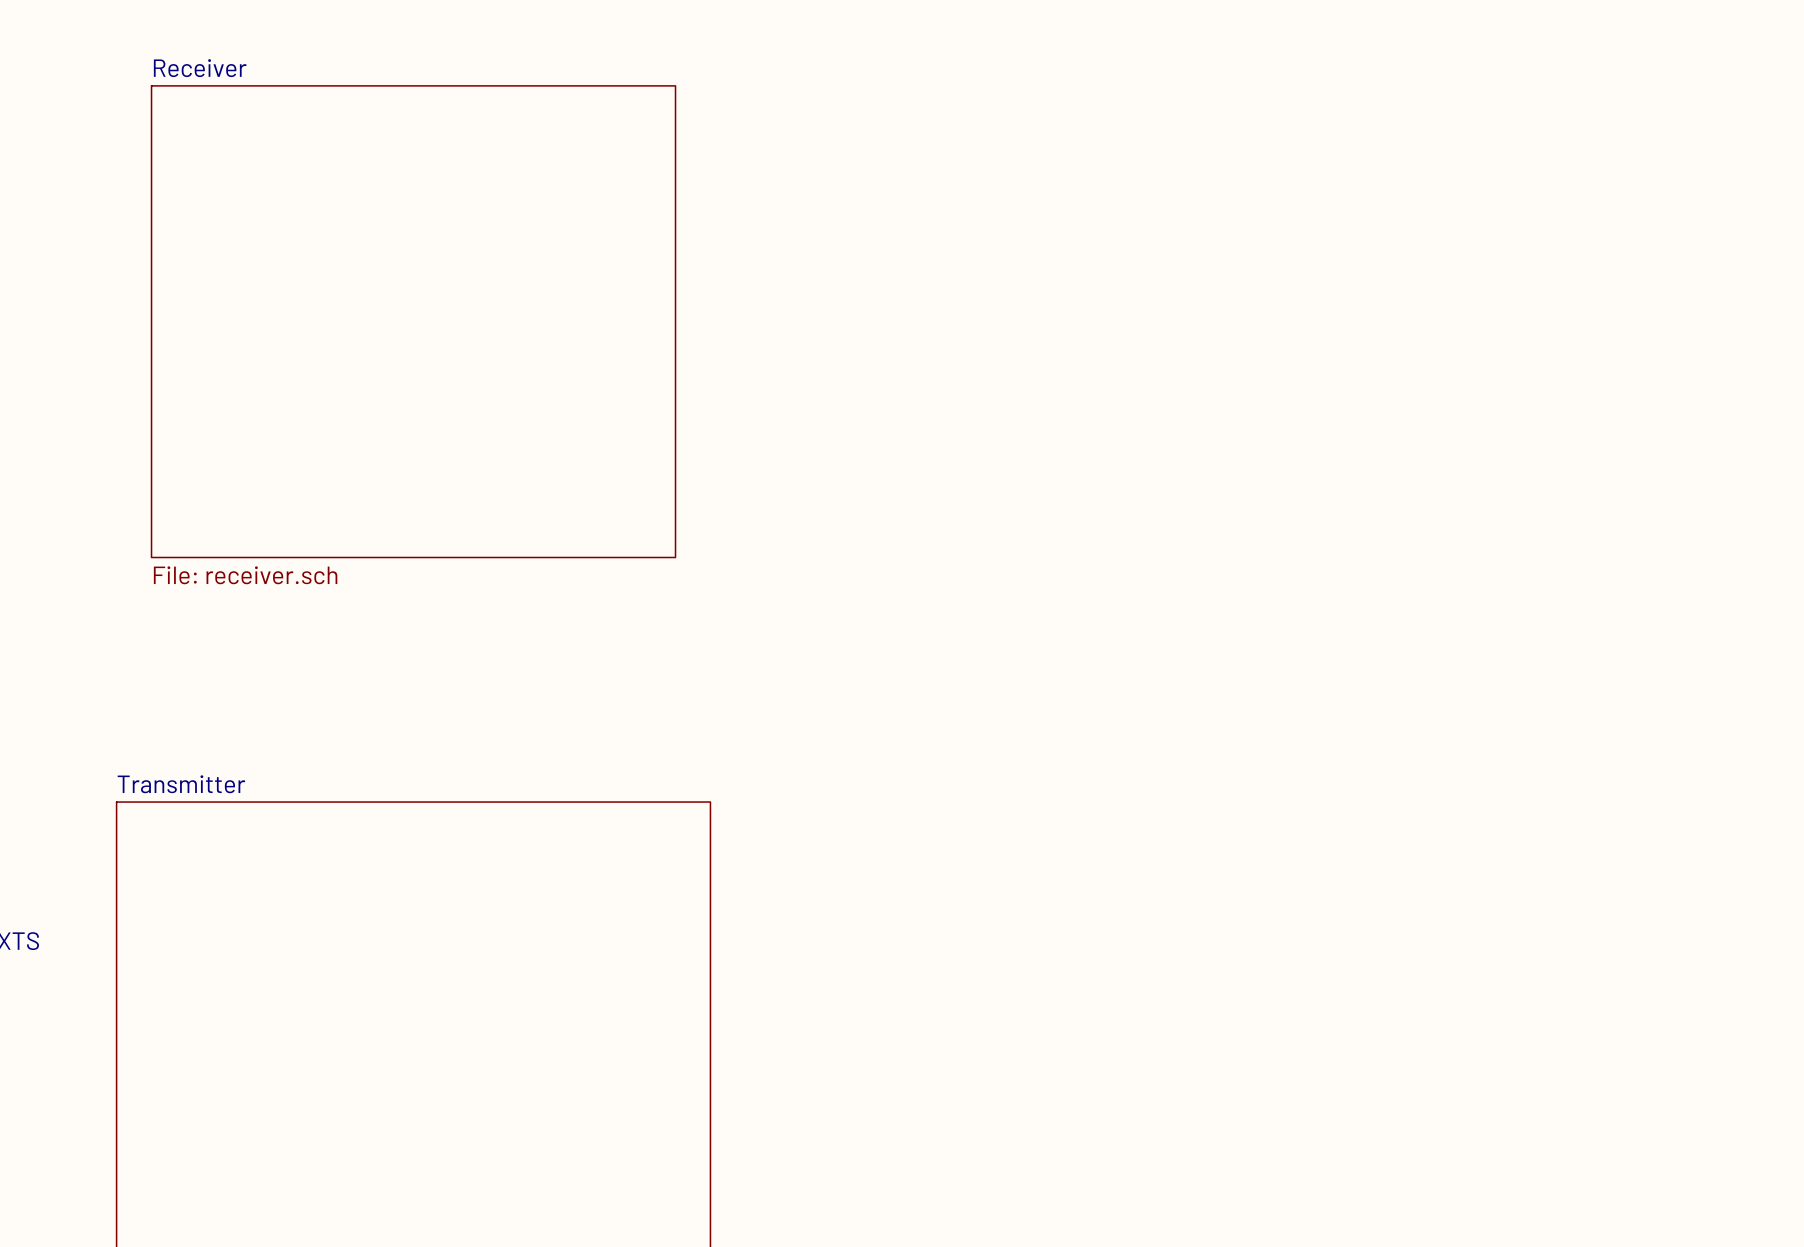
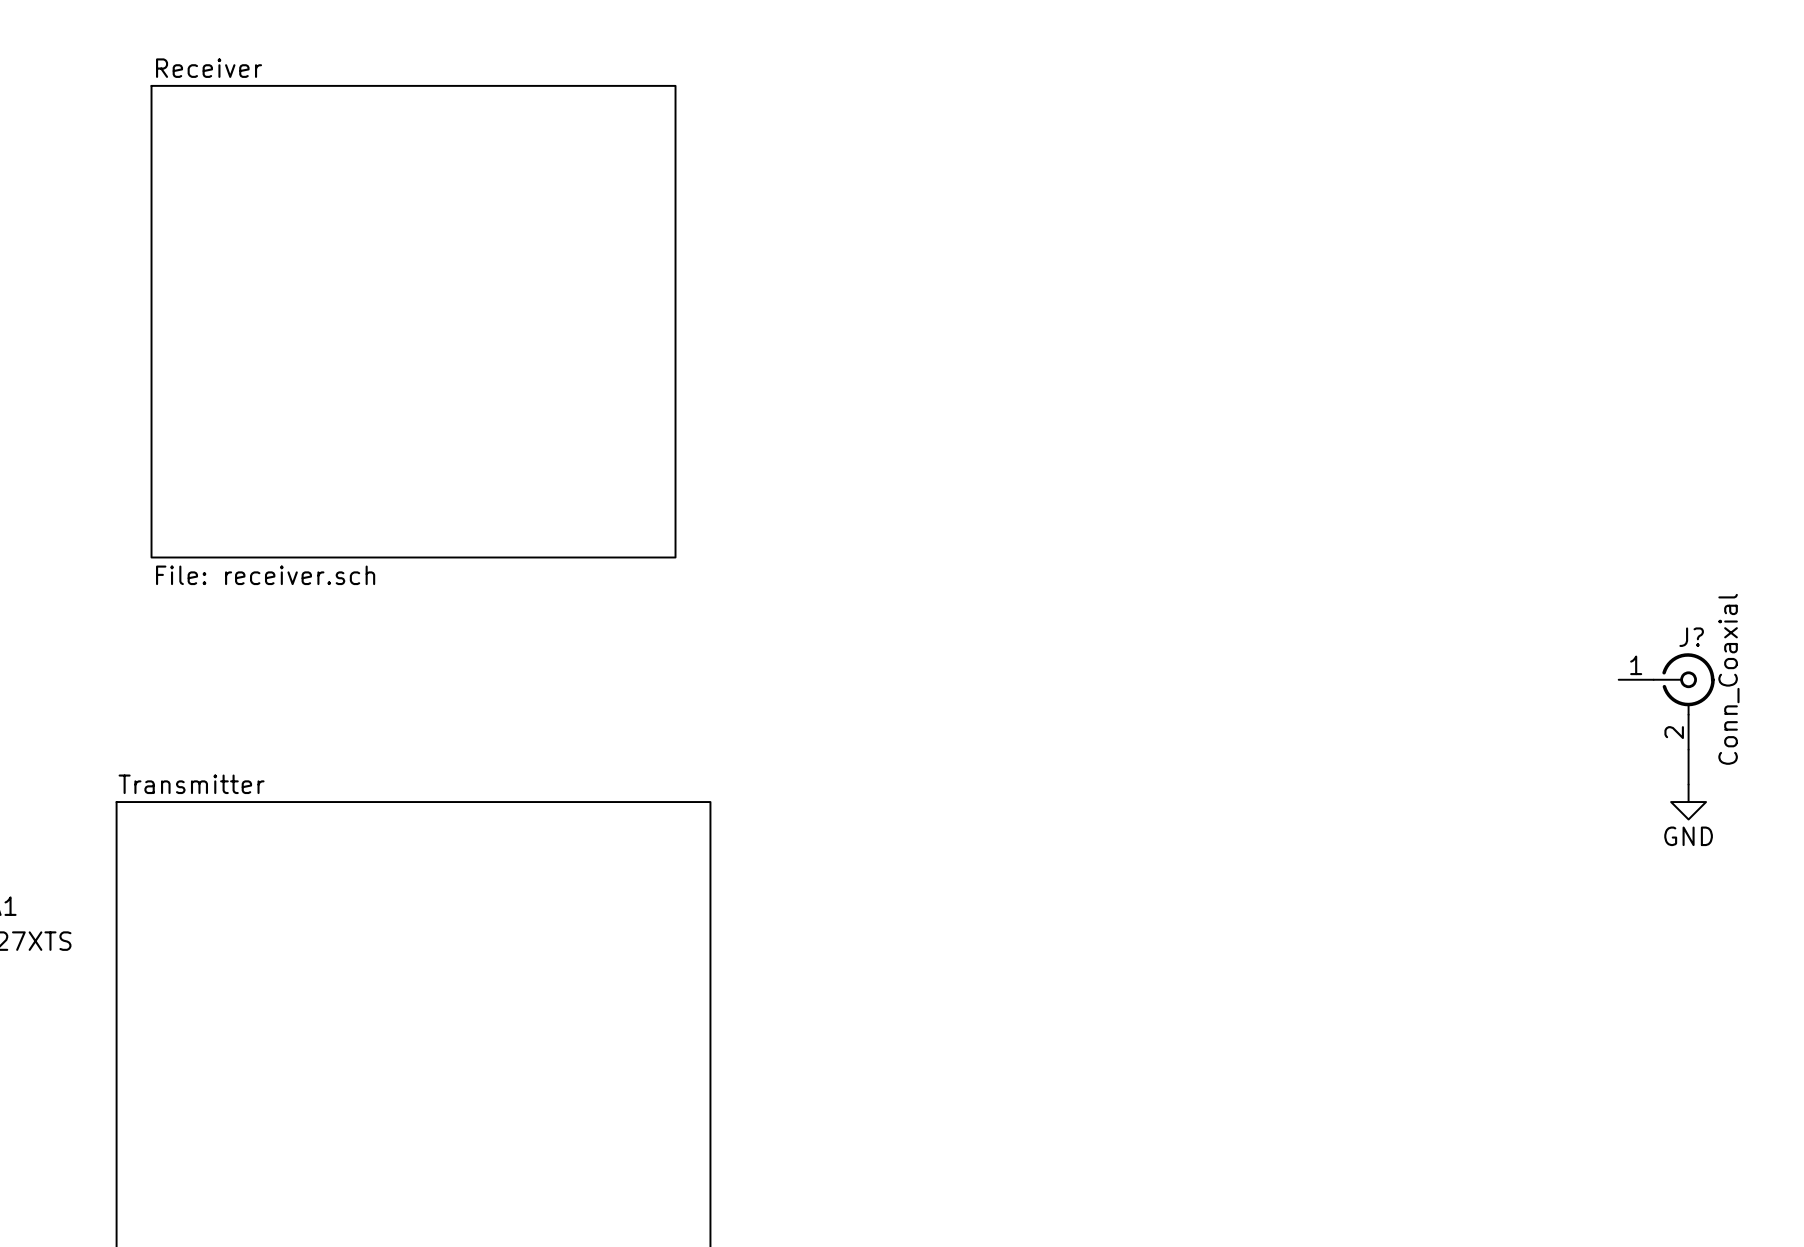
J?: none -> Conn_Coaxial (1666, 701)
wire: none -> (1688, 749) (1688, 784)
power symbol: none -> GND (1688, 802)

